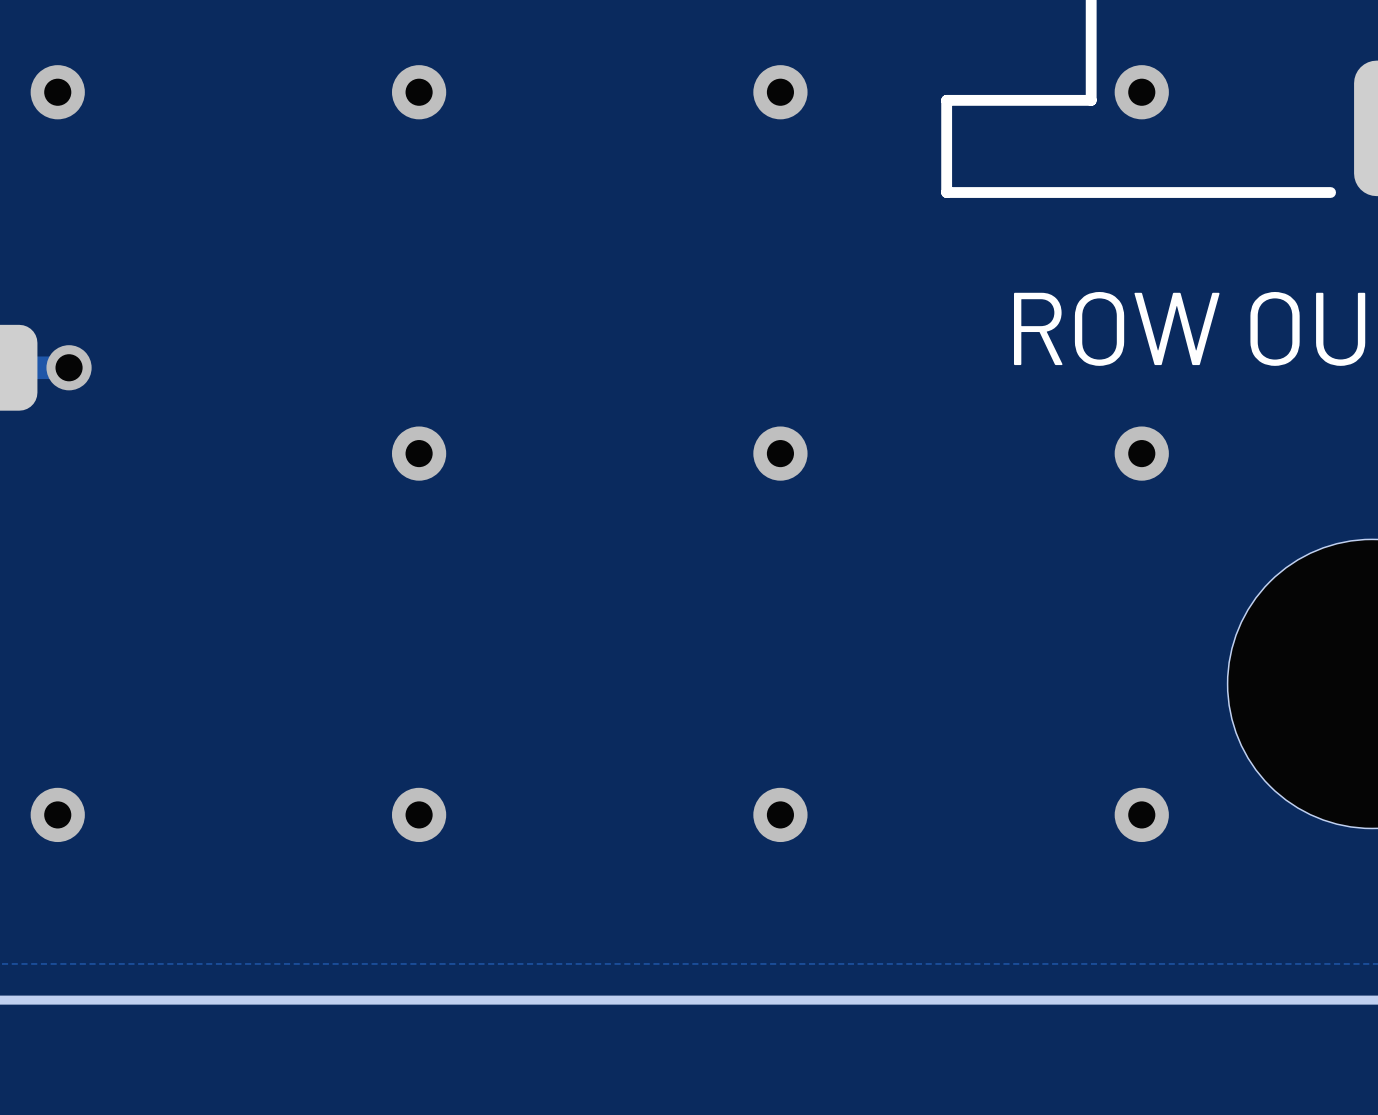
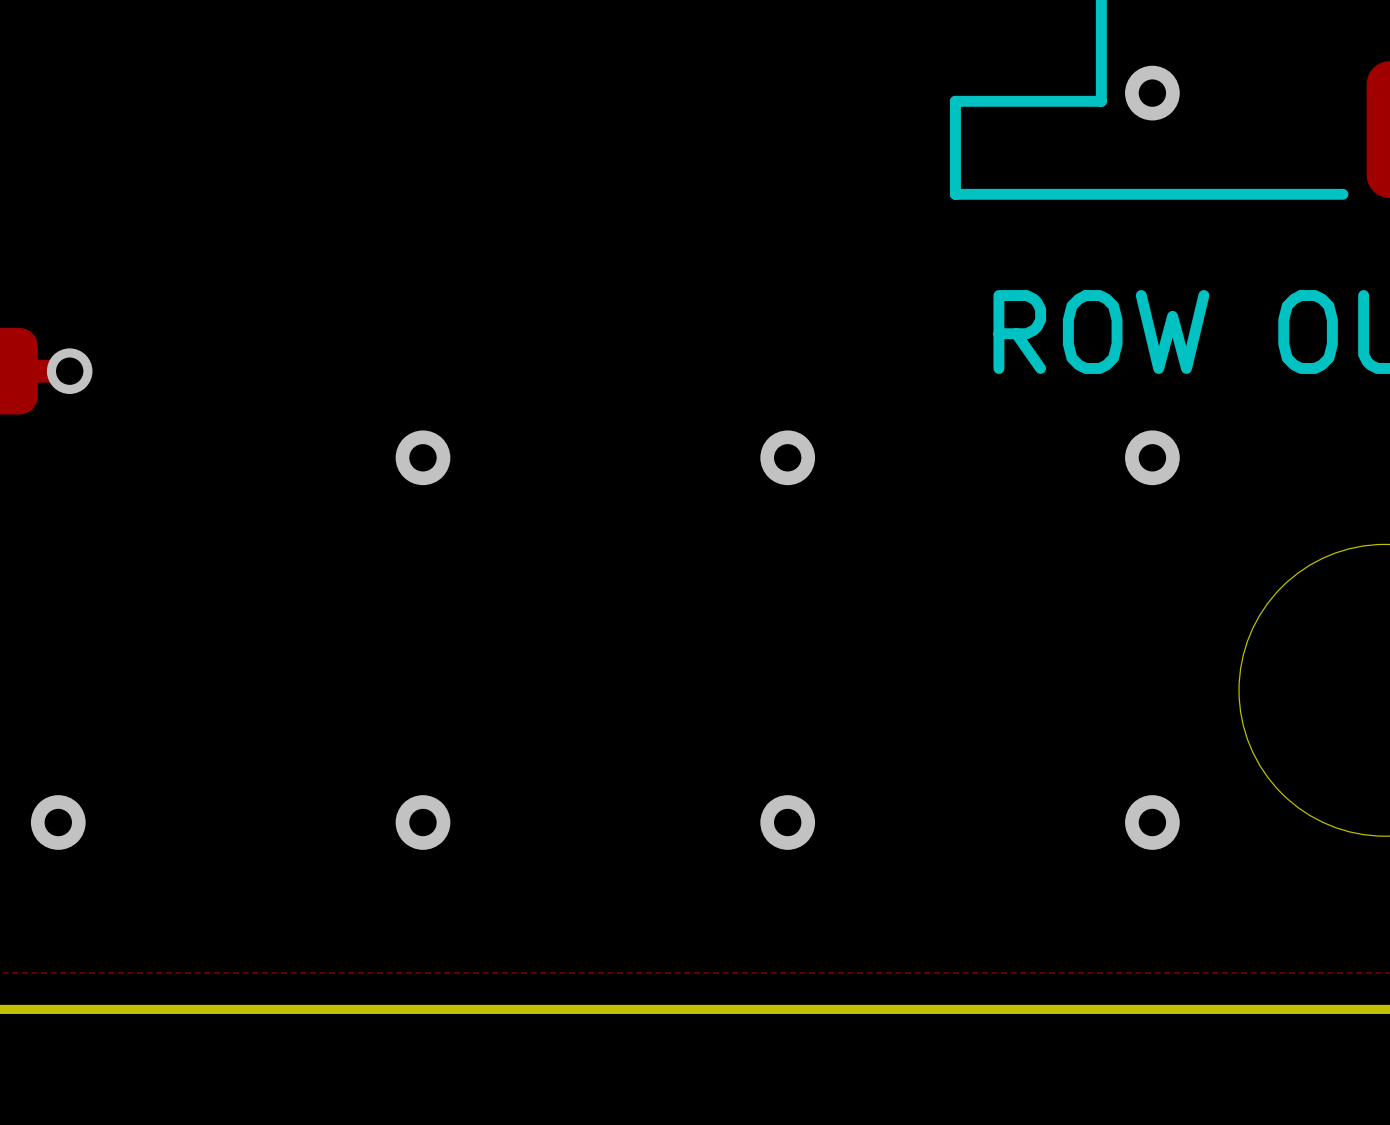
via: (57, 92) -> none
via: (419, 92) -> none
via: (780, 92) -> none

